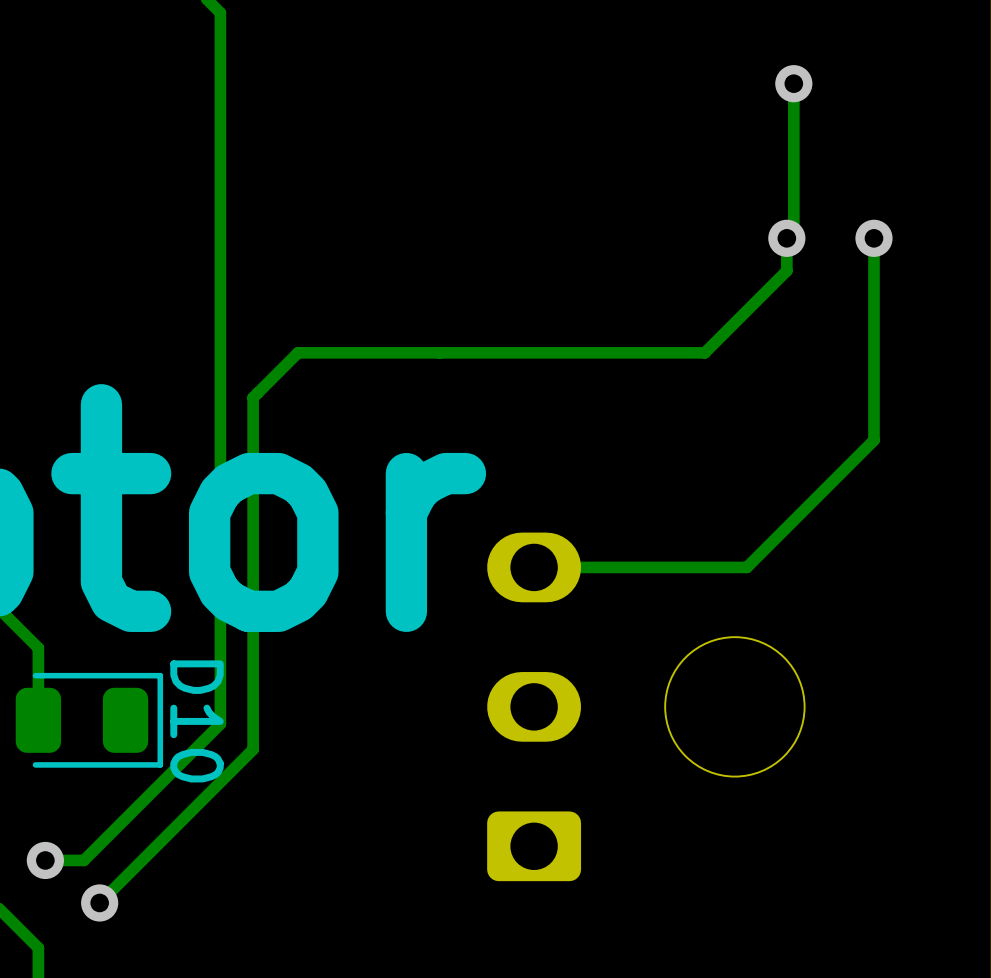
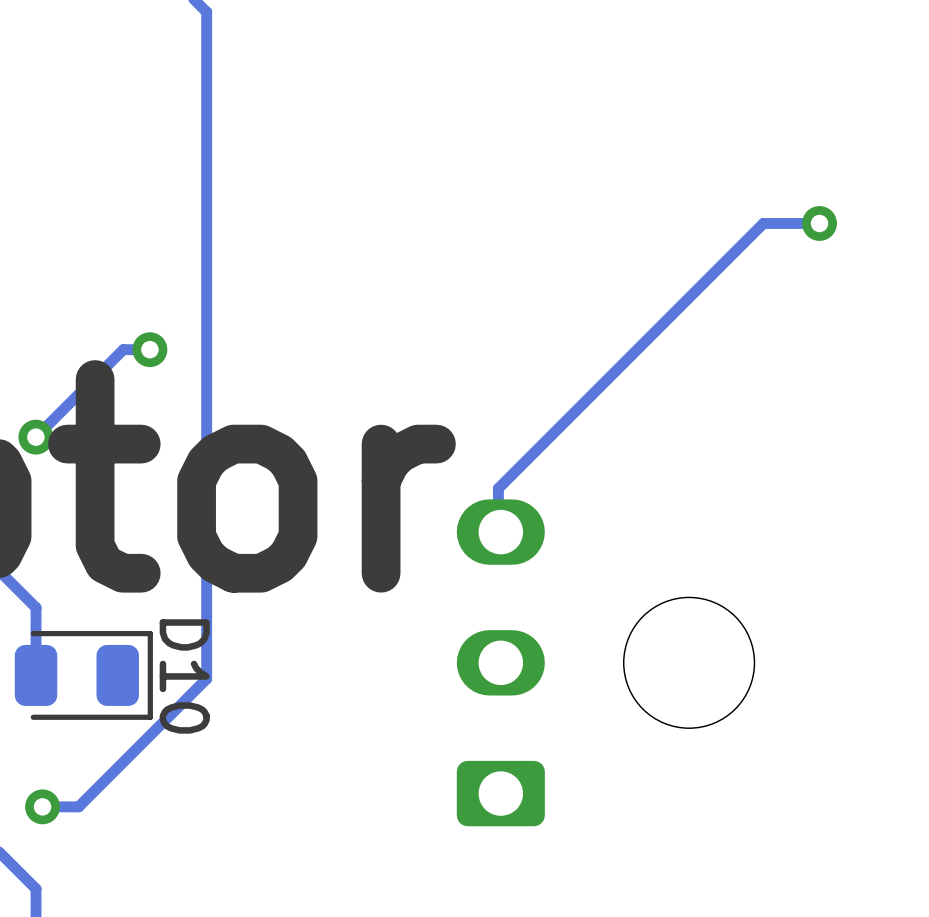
track: (793, 83) (793, 231) (786, 238) (786, 270) (704, 352) (298, 352) (253, 397) (253, 749) (99, 902) -> none
via: (793, 83) -> none
via: (786, 238) -> none
track: (873, 238) (873, 440) (746, 567) (534, 567) -> (819, 223) (763, 223) (498, 488) (498, 532)
track: none -> (149, 349) (123, 349) (35, 437)
via: none -> (149, 349)
via: none -> (35, 437)
via: (99, 902) -> none

